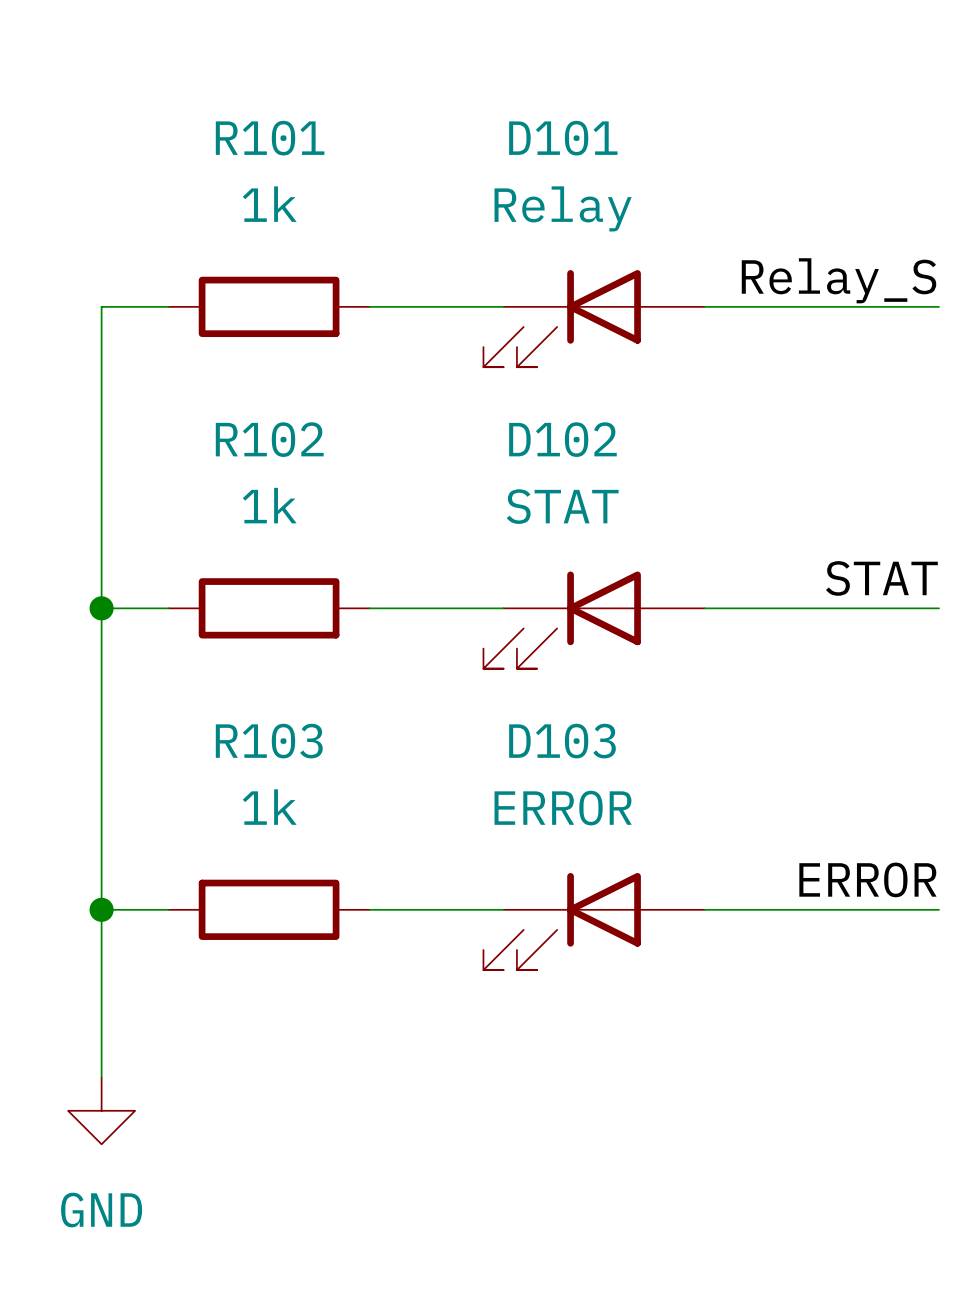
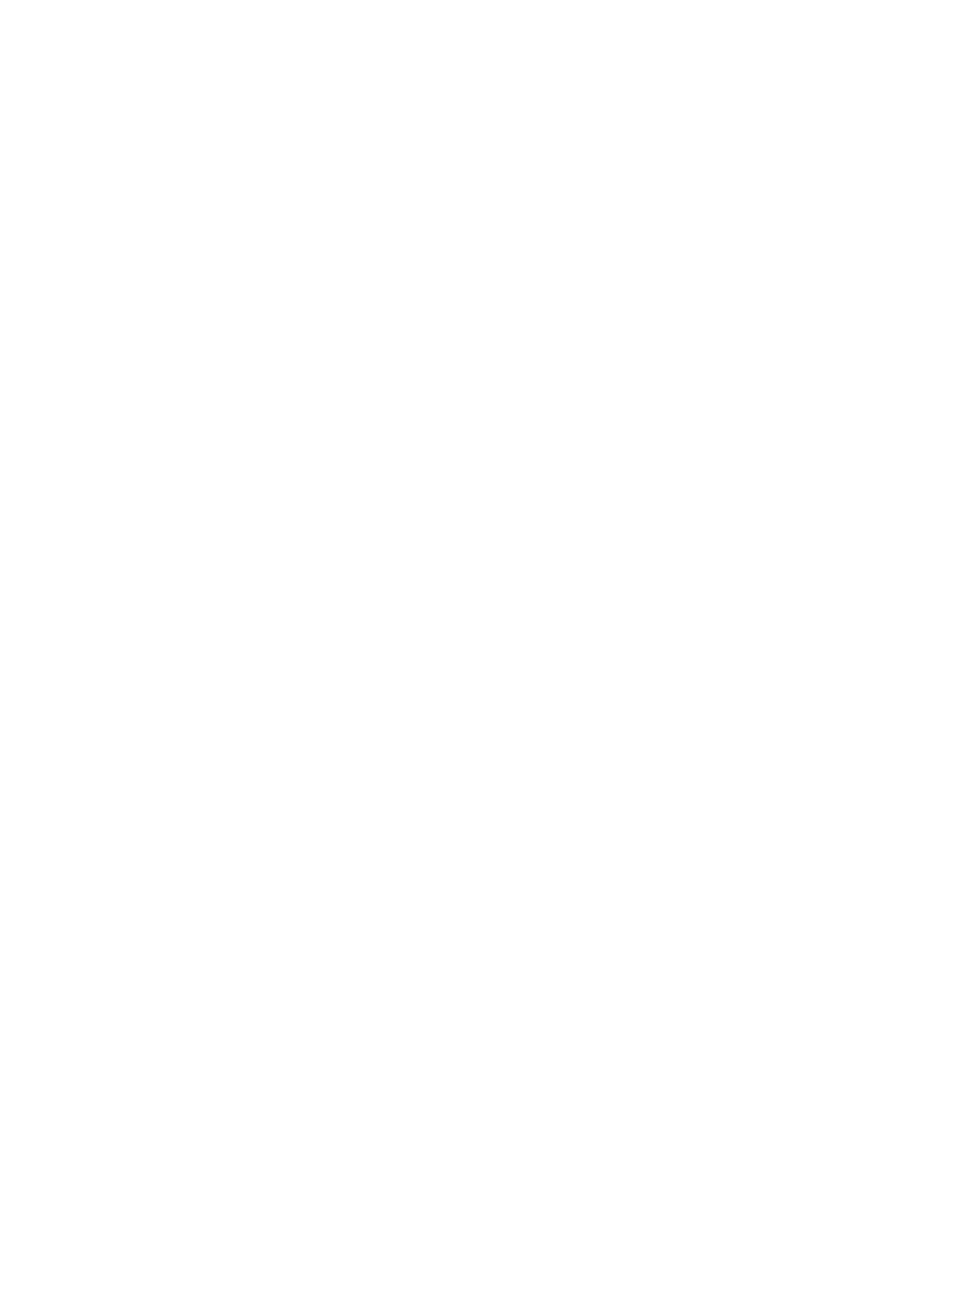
label: Relay_S (839, 280) -> none
wire: (168, 306) (101, 306) (101, 1077) -> none
R101: 1k (269, 306) -> none
wire: (369, 306) (503, 306) -> none
wire: (704, 306) (939, 306) -> none
D101: Relay (594, 318) -> none
label: STAT (881, 578) -> none
wire: (101, 608) (168, 608) -> none
junction: (101, 608) -> none
R102: 1k (269, 608) -> none
wire: (369, 608) (503, 608) -> none
wire: (704, 608) (939, 608) -> none
D102: STAT (594, 620) -> none
label: ERROR (867, 879) -> none
wire: (101, 909) (168, 909) -> none
junction: (101, 909) -> none
R103: 1k (269, 909) -> none
wire: (369, 909) (503, 909) -> none
wire: (704, 909) (939, 909) -> none
D103: ERROR (594, 921) -> none
power symbol: GND (101, 1110) -> none

